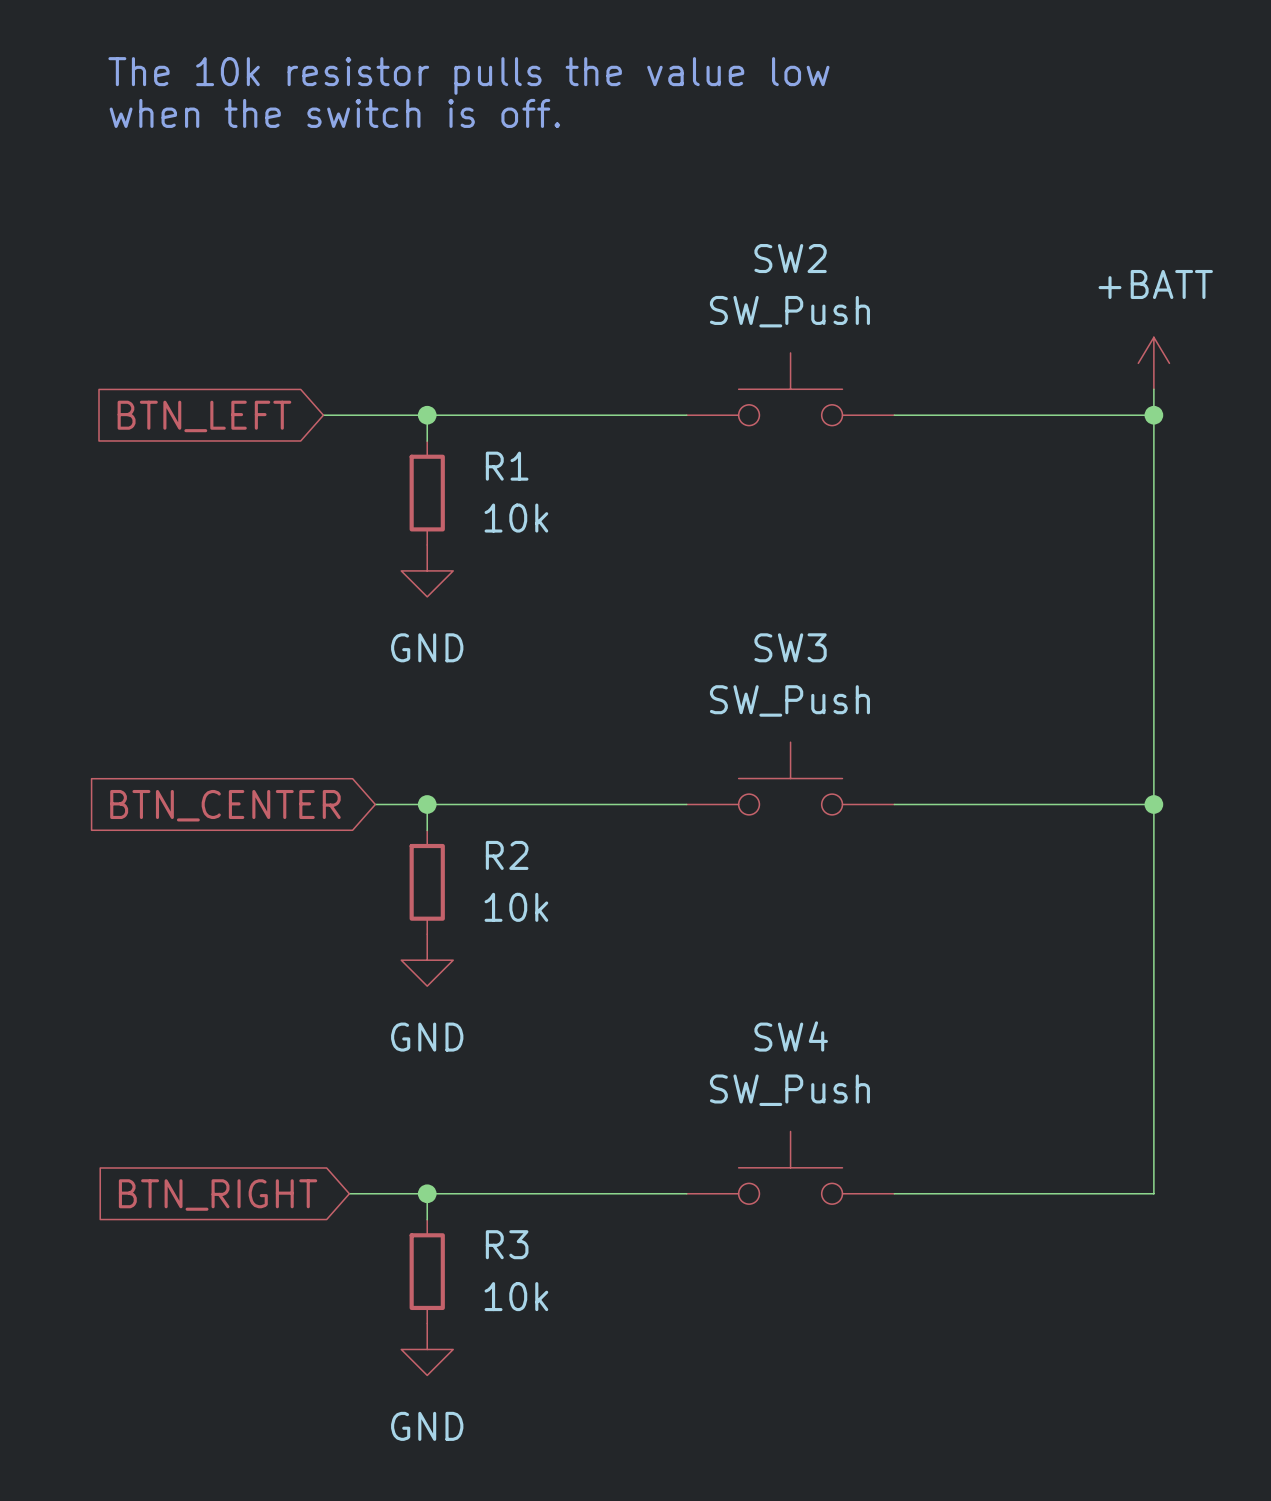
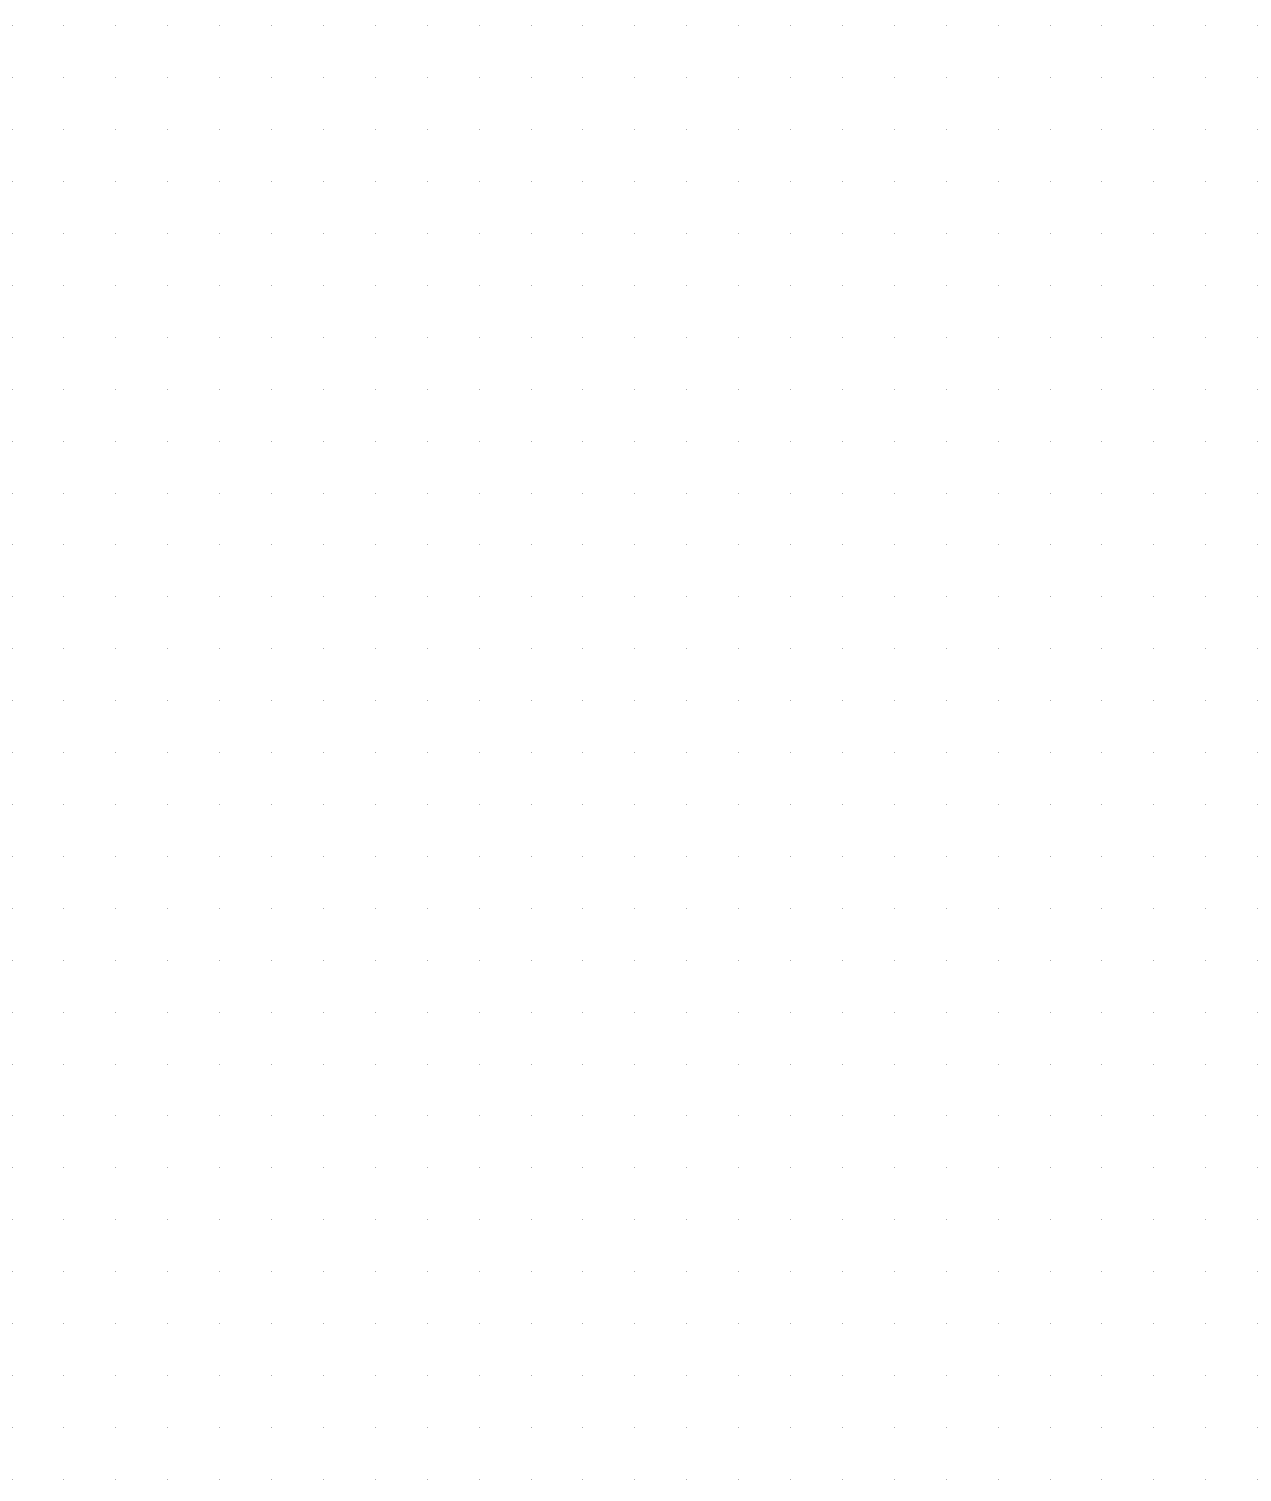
text: The 10k resistor pulls the value low (468, 75) -> none
text: when the switch is off. (334, 113) -> none
power symbol: +BATT (1153, 363) -> none
SW2: SW_Push (790, 389) -> none
wire: (1153, 389) (1153, 1193) (894, 1193) -> none
wire: (323, 415) (686, 415) -> none
wire: (427, 415) (427, 441) -> none
junction: (427, 415) -> none
wire: (894, 415) (1153, 415) -> none
junction: (1153, 415) -> none
global label: BTN_LEFT (204, 416) -> none
R1: 10k (427, 493) -> none
power symbol: GND (427, 570) -> none
SW3: SW_Push (790, 778) -> none
wire: (375, 804) (686, 804) -> none
wire: (427, 804) (427, 830) -> none
junction: (427, 804) -> none
wire: (894, 804) (1153, 804) -> none
junction: (1153, 804) -> none
global label: BTN_CENTER (225, 805) -> none
R2: 10k (427, 882) -> none
power symbol: GND (427, 960) -> none
SW4: SW_Push (790, 1167) -> none
wire: (349, 1193) (686, 1193) -> none
wire: (427, 1193) (427, 1219) -> none
junction: (427, 1193) -> none
global label: BTN_RIGHT (218, 1195) -> none
R3: 10k (427, 1271) -> none
power symbol: GND (427, 1349) -> none

